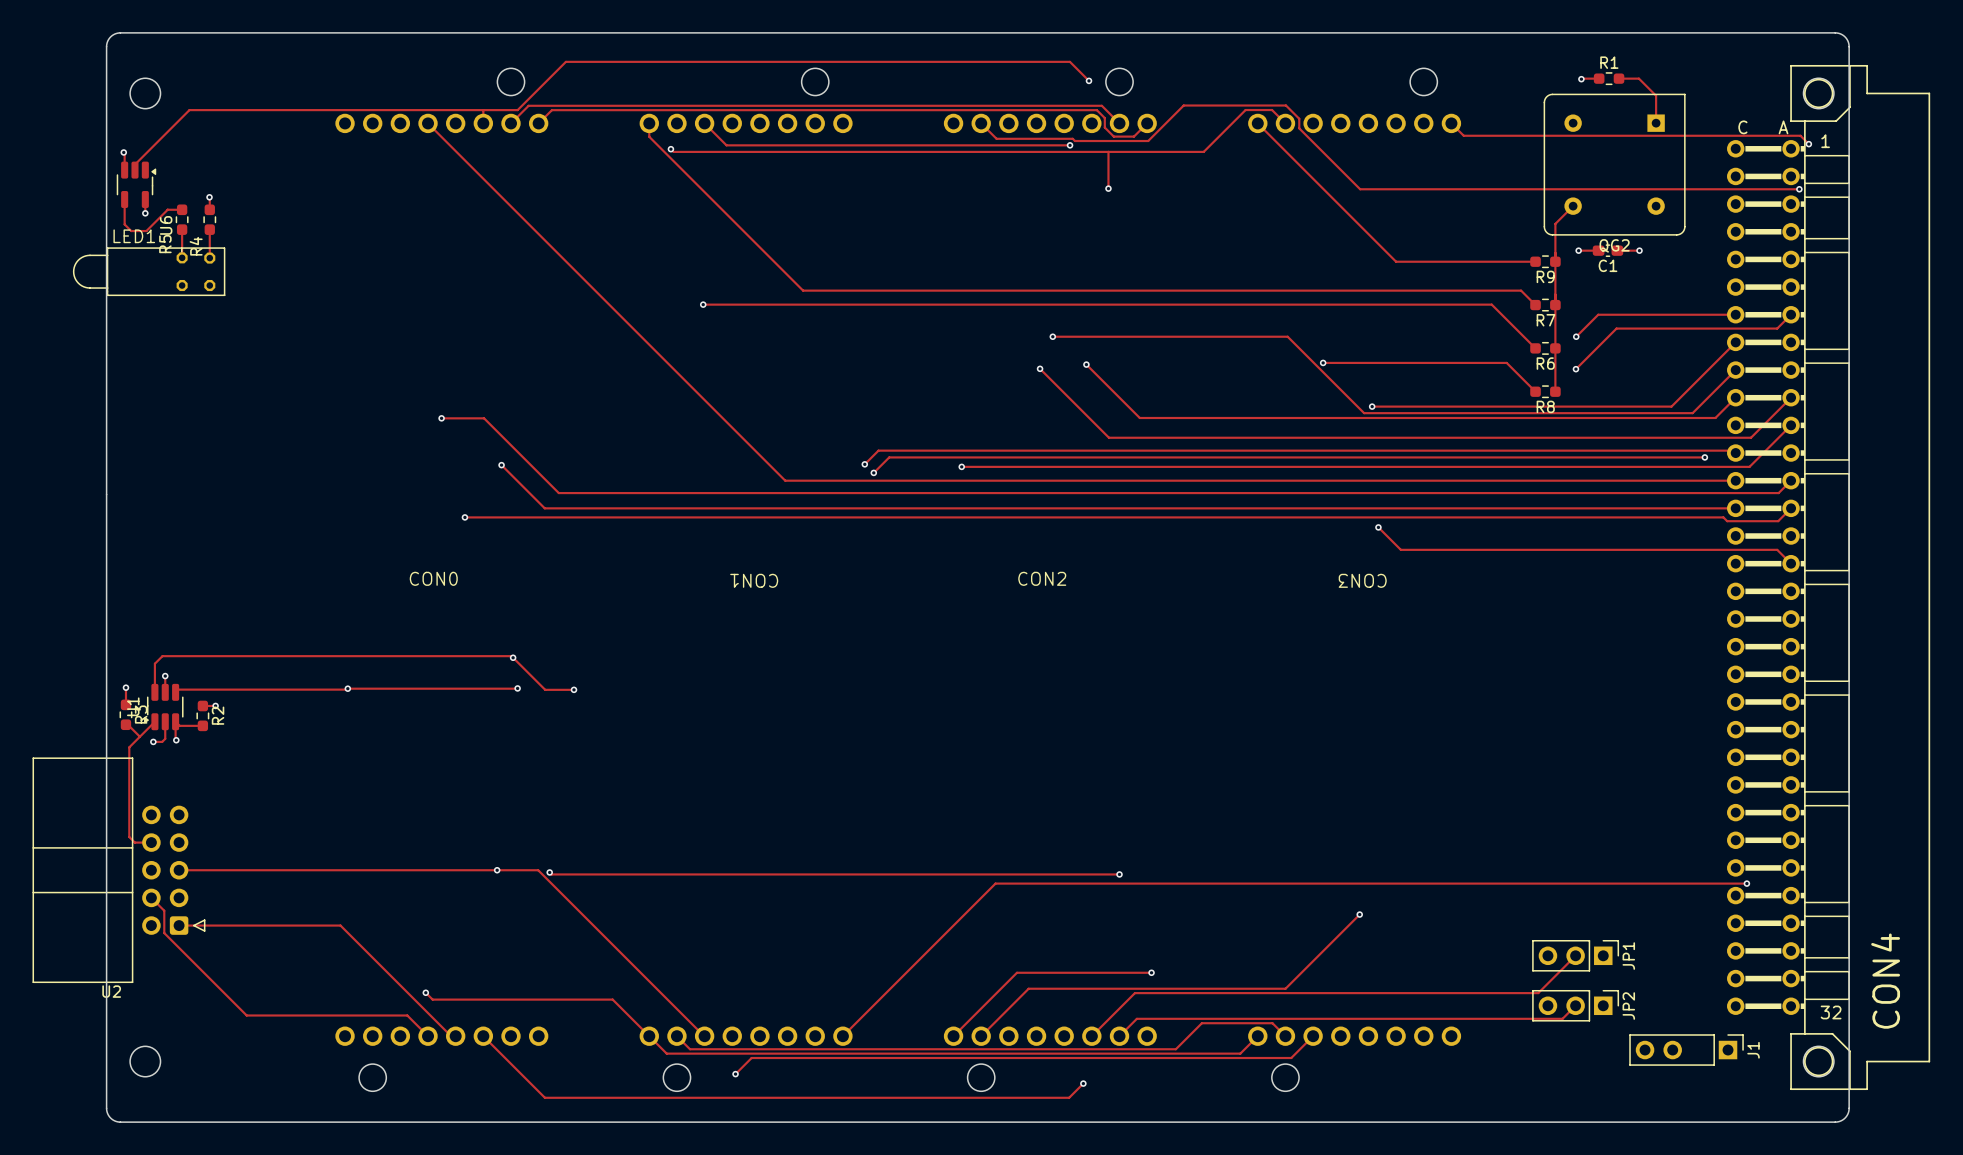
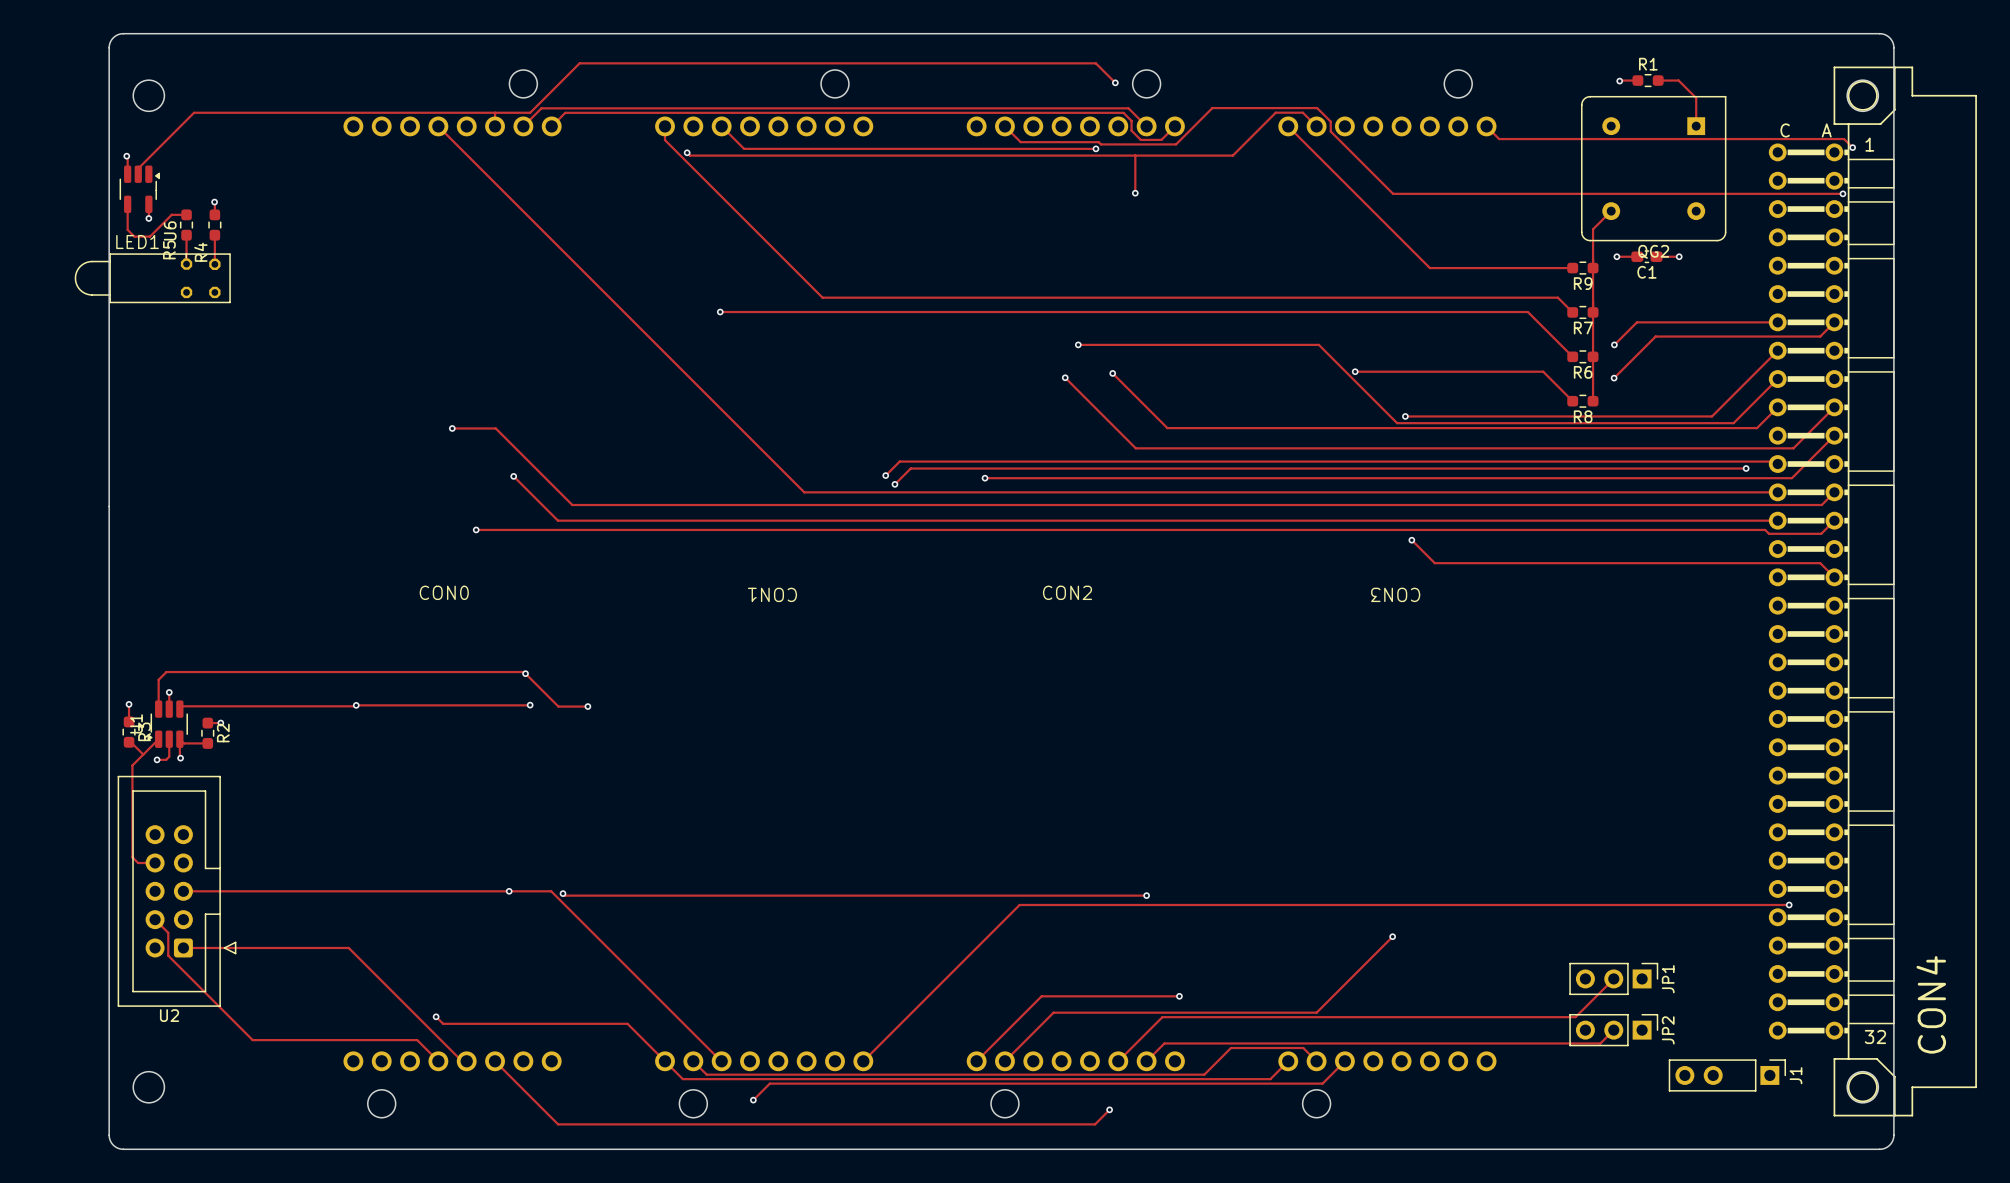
U2 footprint: [32, 757, 206, 983] -> [117, 775, 237, 1007]

